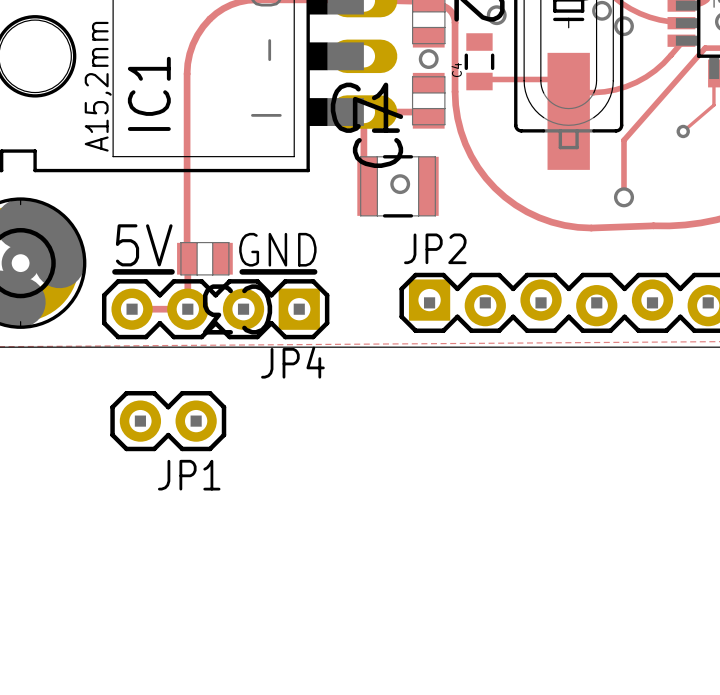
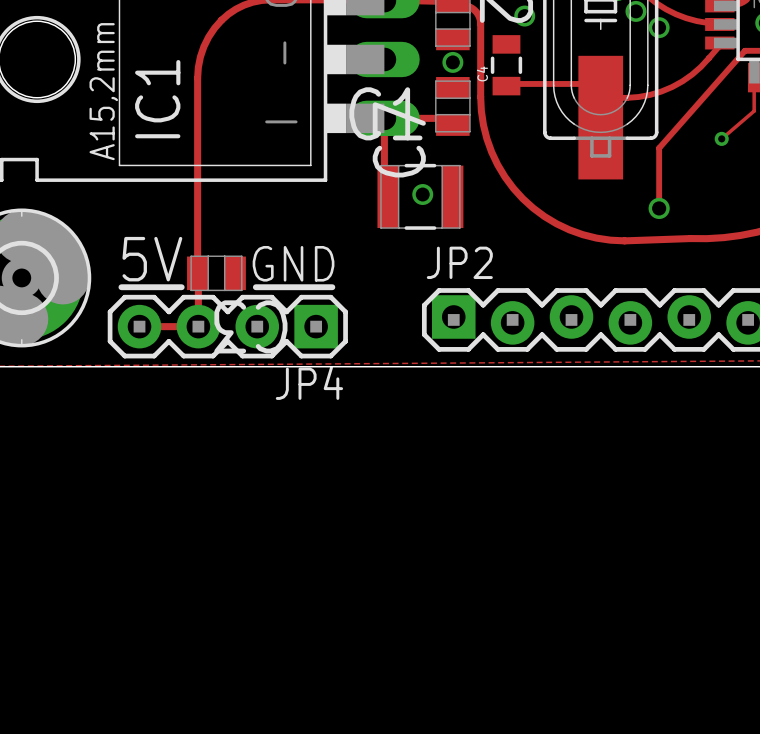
JP1: (168, 421) -> none

